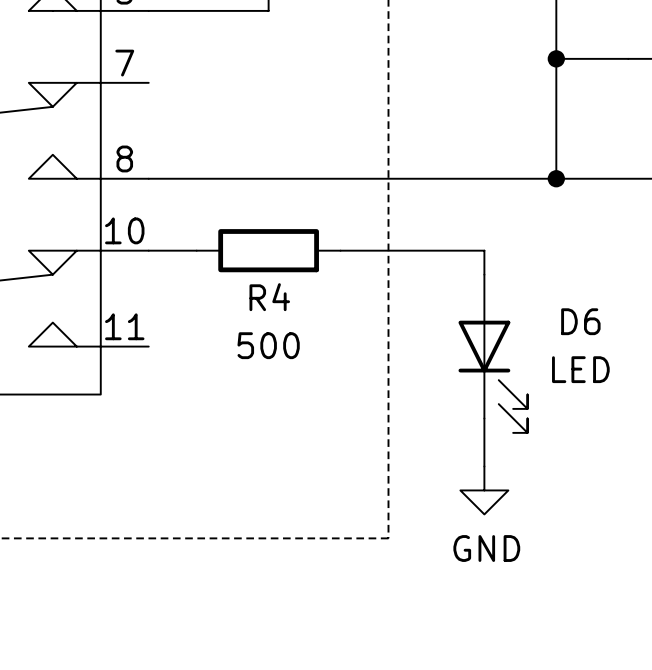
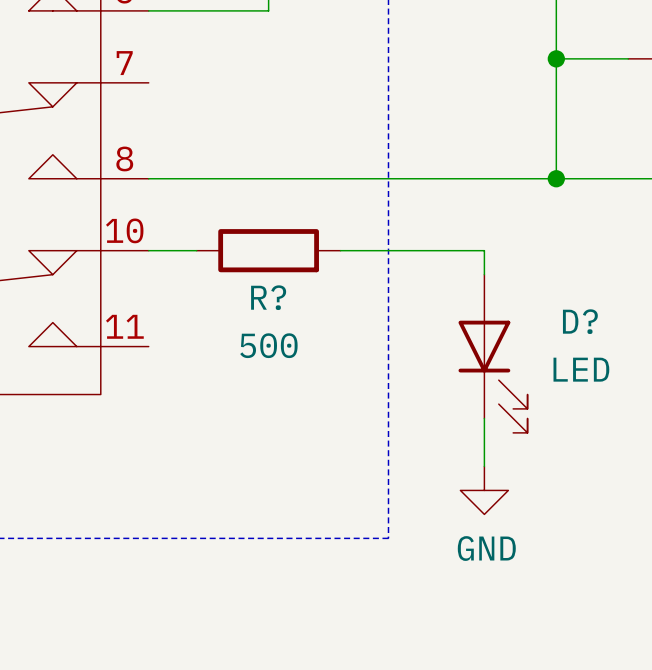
R4 name: R4 (269, 297) -> R? (268, 297)
D6 name: D6 (580, 321) -> D? (580, 321)

